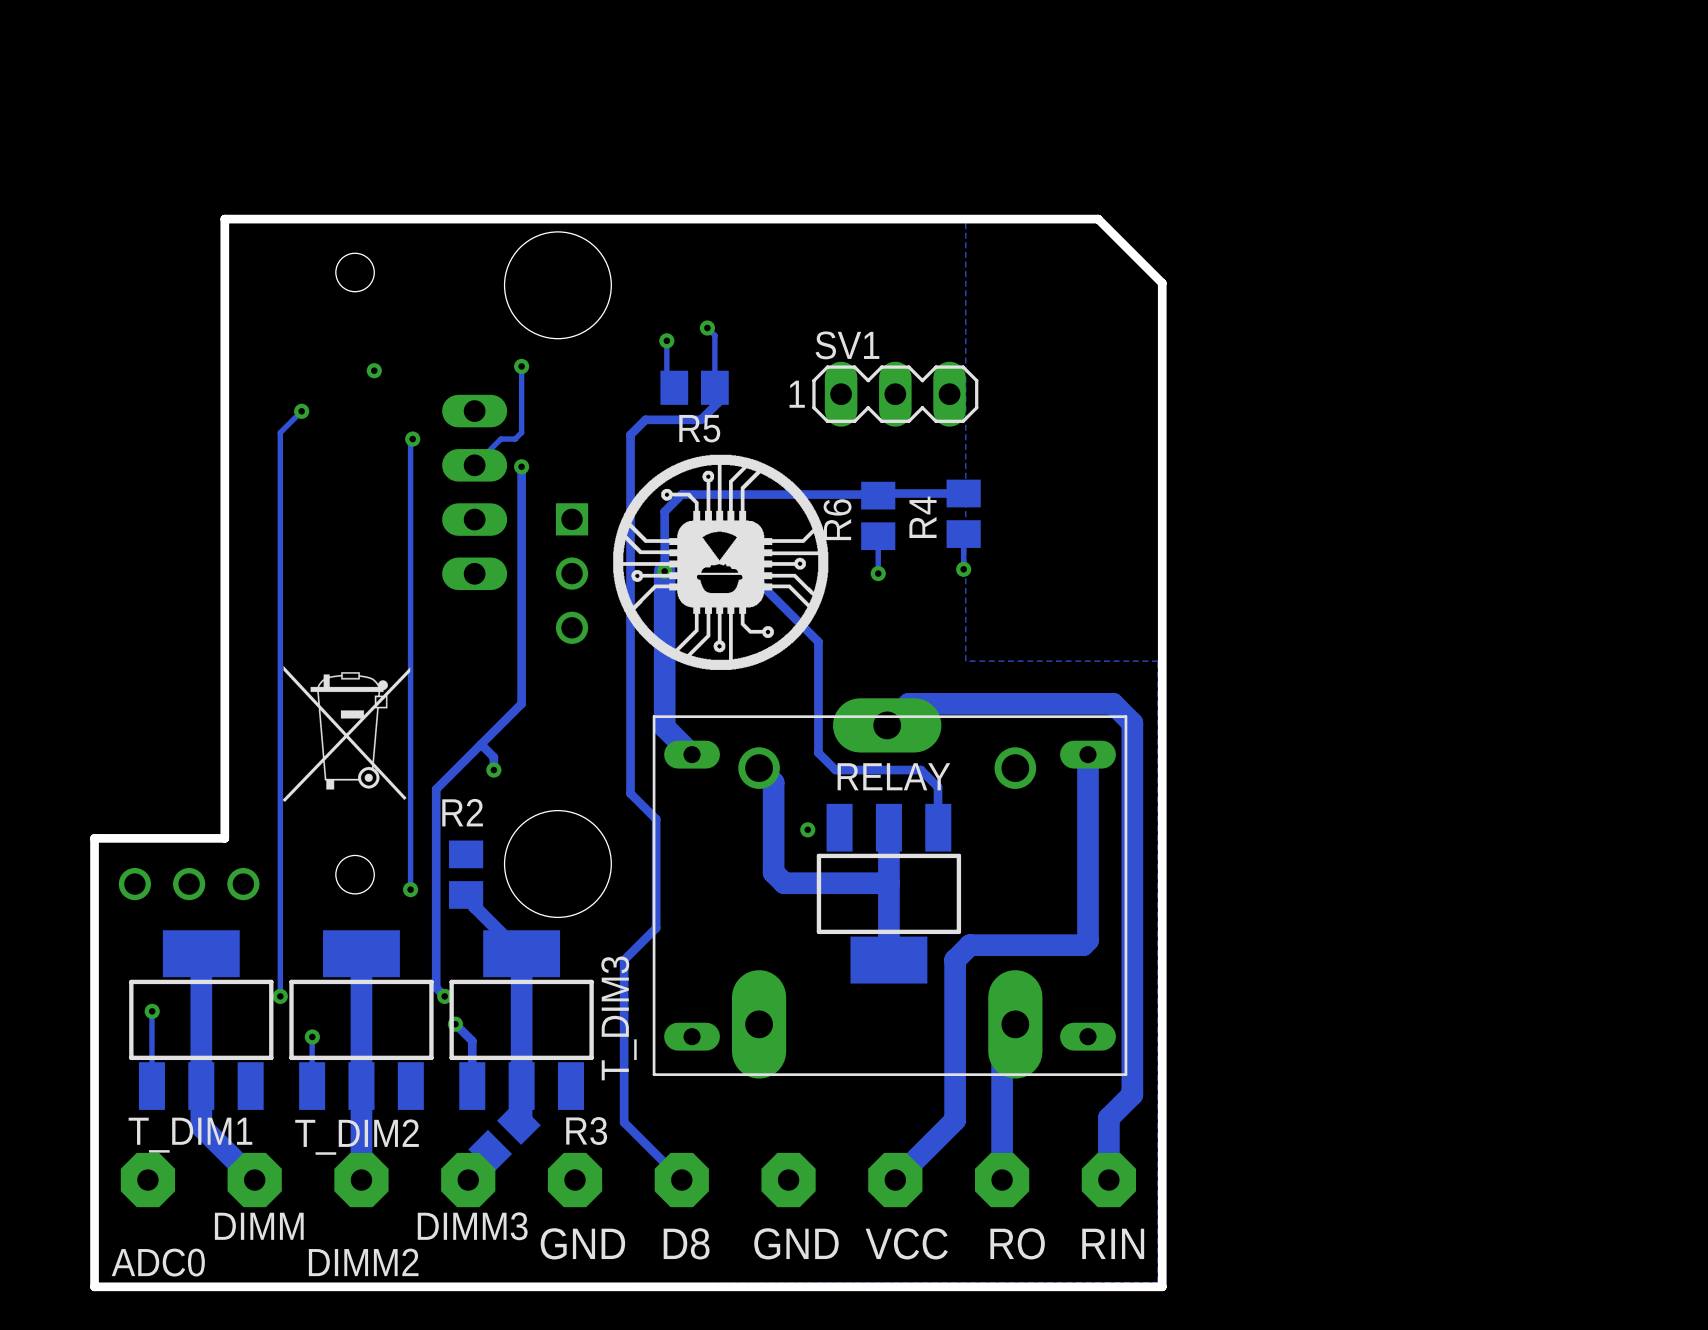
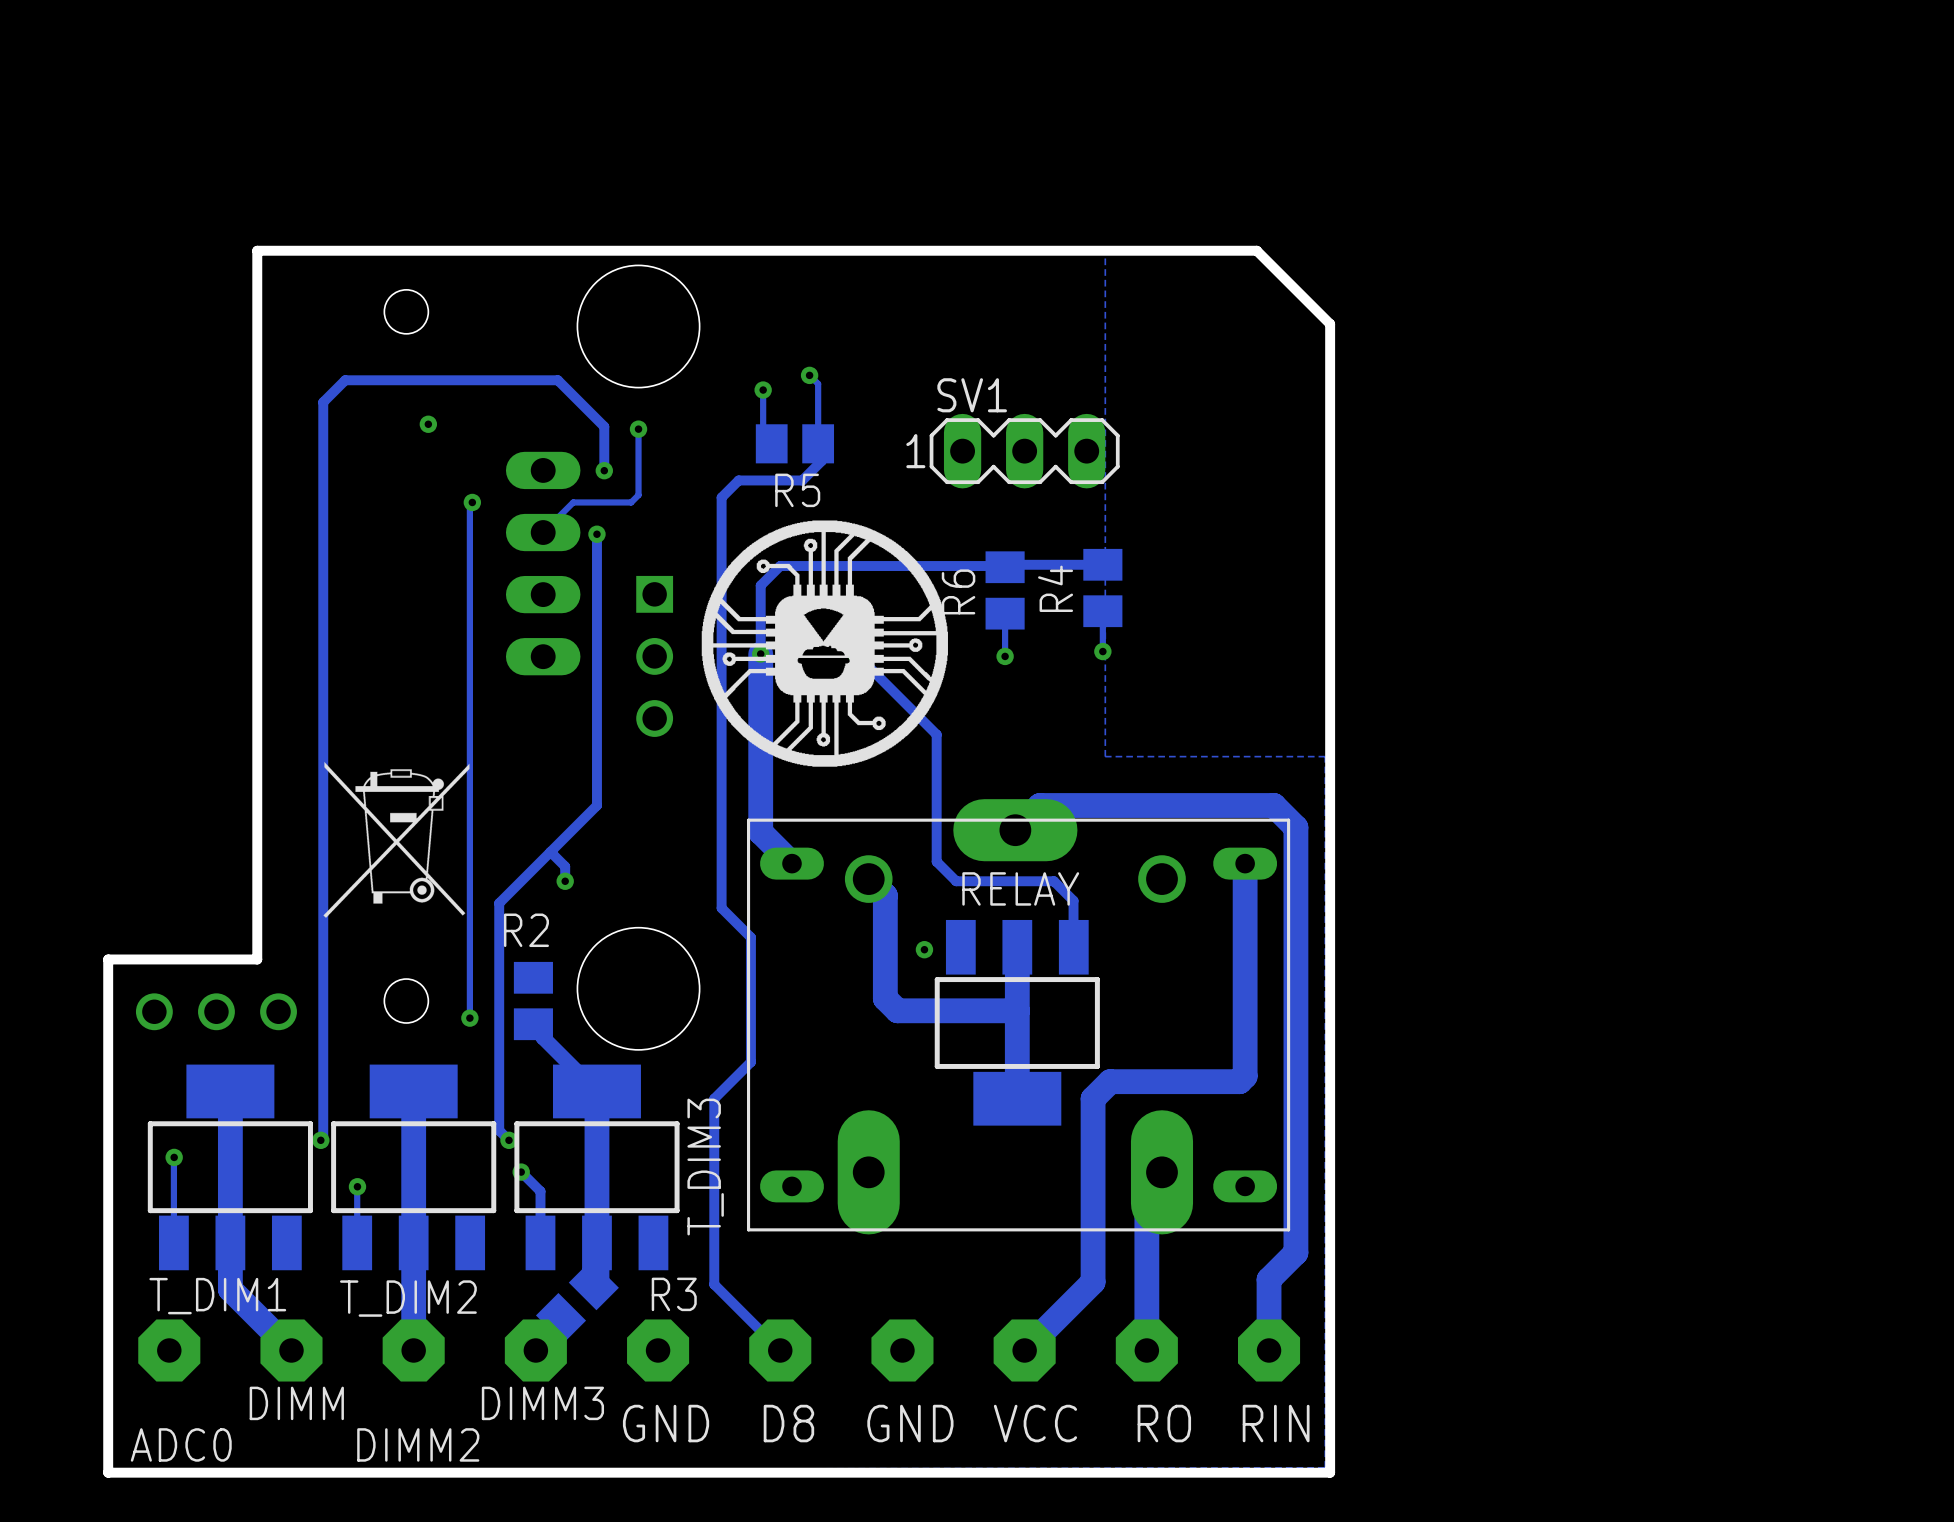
track: (521, 366) (521, 432) (515, 439) -> (638, 429) (638, 495) (631, 502) (589, 502)
via: (521, 366) -> none
via: none -> (638, 429)
track: (301, 411) (280, 432) (280, 996) -> none
via: (301, 411) -> none
track: none -> (604, 470) (604, 426) (557, 380) (345, 380) (323, 402) (323, 1142)
via: none -> (604, 470)

